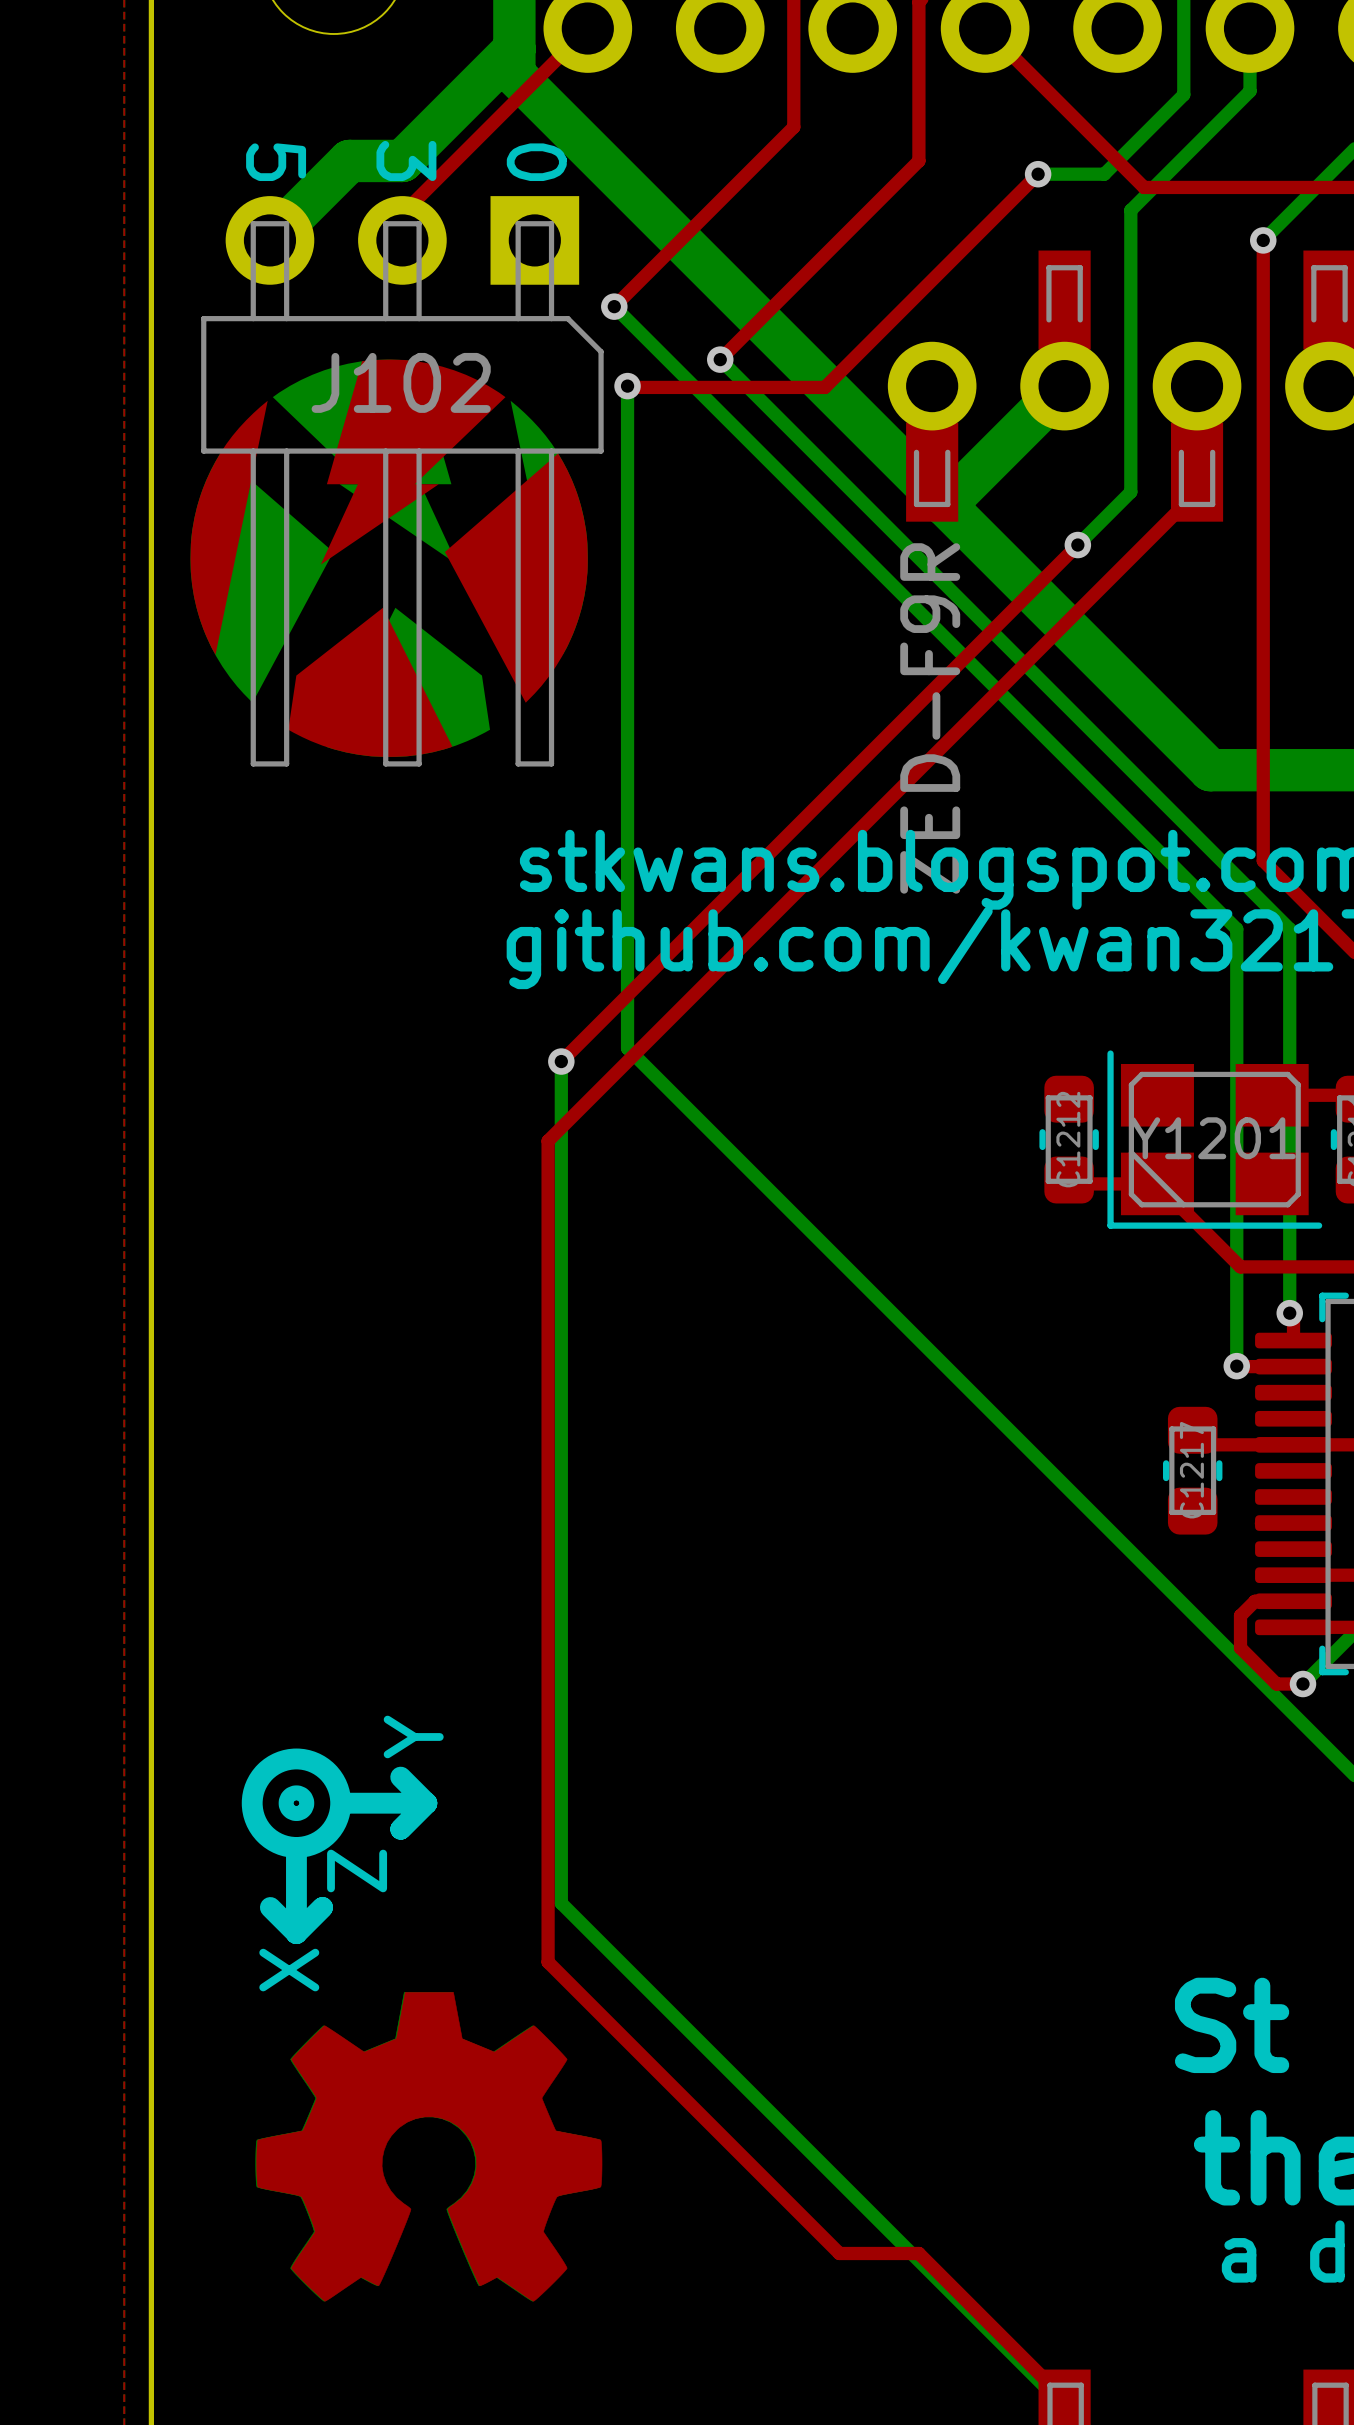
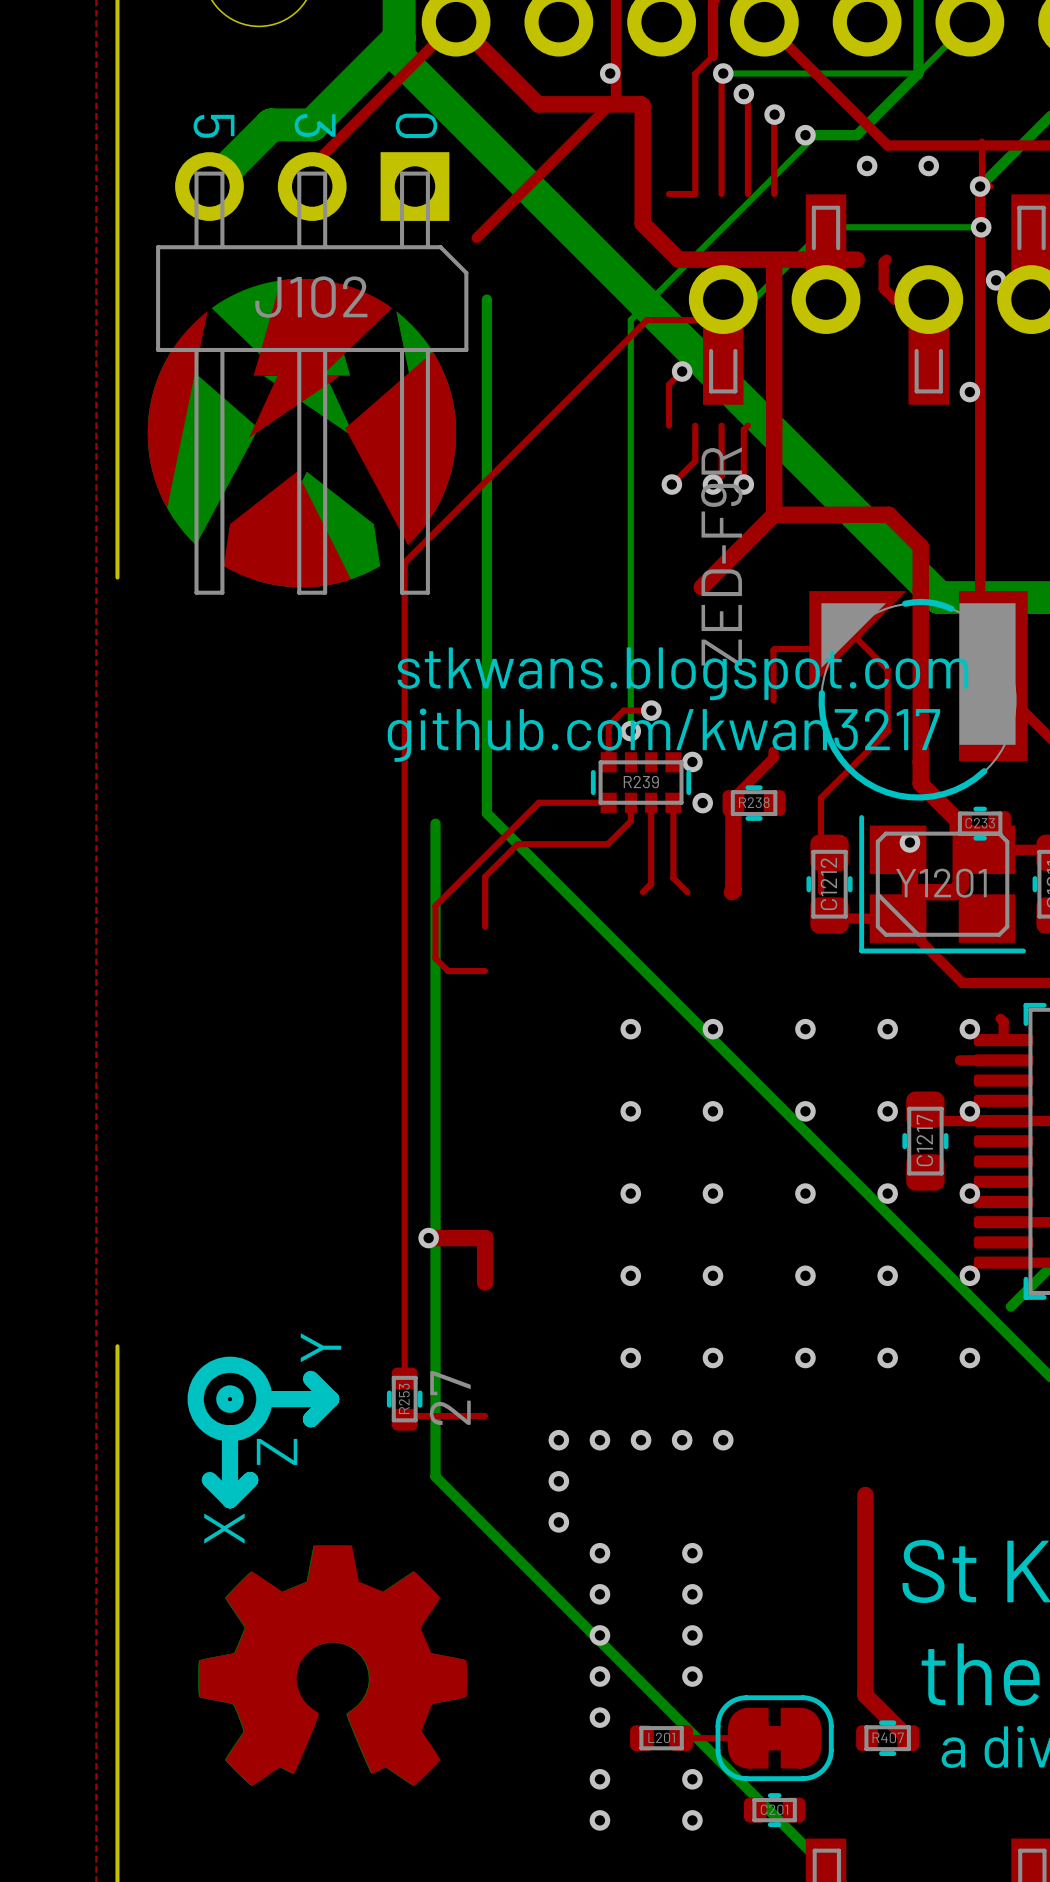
top track: none -> (456, 22) (538, 104) (641, 104) (642, 105) (642, 223) (678, 259) (856, 259)
bottom track: (1250, 28) (1250, 91) (1130, 210) (1130, 492) (1077, 545) -> (969, 22) (918, 73) (723, 73)
top track: (918, 72) (918, 160) (720, 359) -> (712, 56) (695, 73) (695, 194) (669, 194)
via: none -> (610, 73)
top track: none -> (723, 73) (721, 75) (721, 194)
via: none -> (723, 73)
top track: none -> (743, 94) (747, 98) (747, 194)
via: none -> (743, 94)
via: none -> (774, 114)
top track: none -> (774, 115) (774, 194)
top track: (1038, 174) (824, 387) (627, 386) -> none
bottom track: none -> (815, 135) (630, 320) (630, 731)
top track: none -> (981, 141) (981, 178) (990, 186)
via: none -> (867, 165)
via: none -> (928, 165)
bottom track: none -> (981, 227) (826, 227) (733, 320)
via: none -> (981, 227)
bottom track: (614, 306) (1236, 929) (1236, 1366) -> none
via: (614, 306) -> none
top track: none -> (886, 259) (883, 262) (883, 288) (894, 299) (924, 299)
top track: none -> (774, 260) (774, 514)
bottom track: (720, 359) (1289, 929) (1289, 1313) -> none
via: (720, 359) -> none
via: none -> (996, 280)
via: (627, 386) -> none
bottom track: (1064, 386) (945, 505) -> none
top track: none -> (733, 320) (647, 320) (404, 562) (404, 1378)
top track: (1197, 472) (1197, 492) (548, 1141) (548, 1962) (839, 2253) (918, 2253) (1064, 2399) -> none
top track: none -> (682, 371) (669, 384) (669, 425)
via: none -> (682, 371)
via: none -> (969, 392)
top track: (1077, 545) (561, 1061) -> none
via: (1077, 545) -> none
top track: none -> (695, 425) (695, 461) (671, 484)
top track: none -> (721, 425) (721, 475) (712, 484)
top track: none -> (747, 425) (743, 429) (743, 484)
via: none -> (671, 484)
via: none -> (712, 484)
via: none -> (743, 484)
top track: none -> (774, 514) (888, 514) (920, 546) (920, 783) (960, 823) (960, 885) (954, 892) (909, 892) (909, 842)
top track: none -> (774, 514) (701, 587)
board edge: (151, 744) (151, 1735) -> none
part: none -> (918, 695)
top track: none -> (773, 700) (774, 648) (832, 648) (849, 631) (887, 669) (887, 731) (820, 797) (820, 892)
top track: none -> (651, 710) (623, 710) (608, 725) (608, 762)
via: none -> (651, 710)
via: none -> (630, 731)
top track: none -> (773, 751) (773, 757) (733, 798) (733, 890) (731, 892)
via: none -> (692, 761)
R239: none -> (641, 782)
top track: none -> (608, 802) (538, 802) (435, 905) (435, 958) (448, 971) (485, 971)
top track: none -> (630, 802) (630, 821) (607, 844) (517, 844) (485, 876) (485, 926)
top track: none -> (651, 802) (651, 883) (642, 892)
top track: none -> (673, 802) (673, 878) (687, 892)
via: none -> (702, 803)
R238: none -> (754, 803)
via: (561, 1061) -> none
C233: none -> (980, 823)
via: none -> (909, 842)
via: (1289, 1313) -> none
via: none -> (630, 1029)
via: none -> (712, 1029)
via: none -> (805, 1029)
via: none -> (887, 1029)
via: none -> (969, 1029)
via: (1236, 1366) -> none
via: none -> (630, 1111)
via: none -> (712, 1111)
via: none -> (805, 1111)
via: none -> (887, 1111)
via: none -> (969, 1111)
via: none -> (630, 1193)
via: none -> (712, 1193)
via: none -> (805, 1193)
via: none -> (887, 1193)
via: none -> (969, 1193)
top track: none -> (428, 1238) (485, 1238) (485, 1282)
via: none -> (428, 1238)
top track: (1293, 1601) (1255, 1601) (1240, 1615) (1240, 1648) (1276, 1684) (1302, 1684) -> none
via: none -> (630, 1275)
via: none -> (712, 1275)
via: none -> (805, 1275)
via: none -> (887, 1275)
via: none -> (969, 1275)
via: (1302, 1684) -> none
via: none -> (630, 1357)
via: none -> (712, 1357)
via: none -> (805, 1357)
via: none -> (887, 1357)
via: none -> (969, 1357)
R253: none -> 27 (404, 1399)
top track: none -> (485, 1416) (408, 1416) (404, 1419)
via: none -> (558, 1440)
via: none -> (599, 1440)
via: none -> (641, 1440)
via: none -> (682, 1440)
via: none -> (723, 1440)
via: none -> (558, 1481)
top track: none -> (865, 1494) (865, 1695) (908, 1738)
via: none -> (558, 1522)
via: none -> (599, 1553)
via: none -> (692, 1553)
via: none -> (599, 1594)
via: none -> (692, 1594)
via: none -> (599, 1635)
via: none -> (692, 1635)
via: none -> (599, 1676)
via: none -> (692, 1676)
via: none -> (599, 1717)
L201: none -> (661, 1738)
top track: none -> (691, 1738) (748, 1738)
part: none -> (774, 1738)
R407: none -> (887, 1738)
via: none -> (599, 1779)
via: none -> (692, 1779)
C201: none -> (774, 1810)
via: none -> (599, 1820)
via: none -> (692, 1820)

